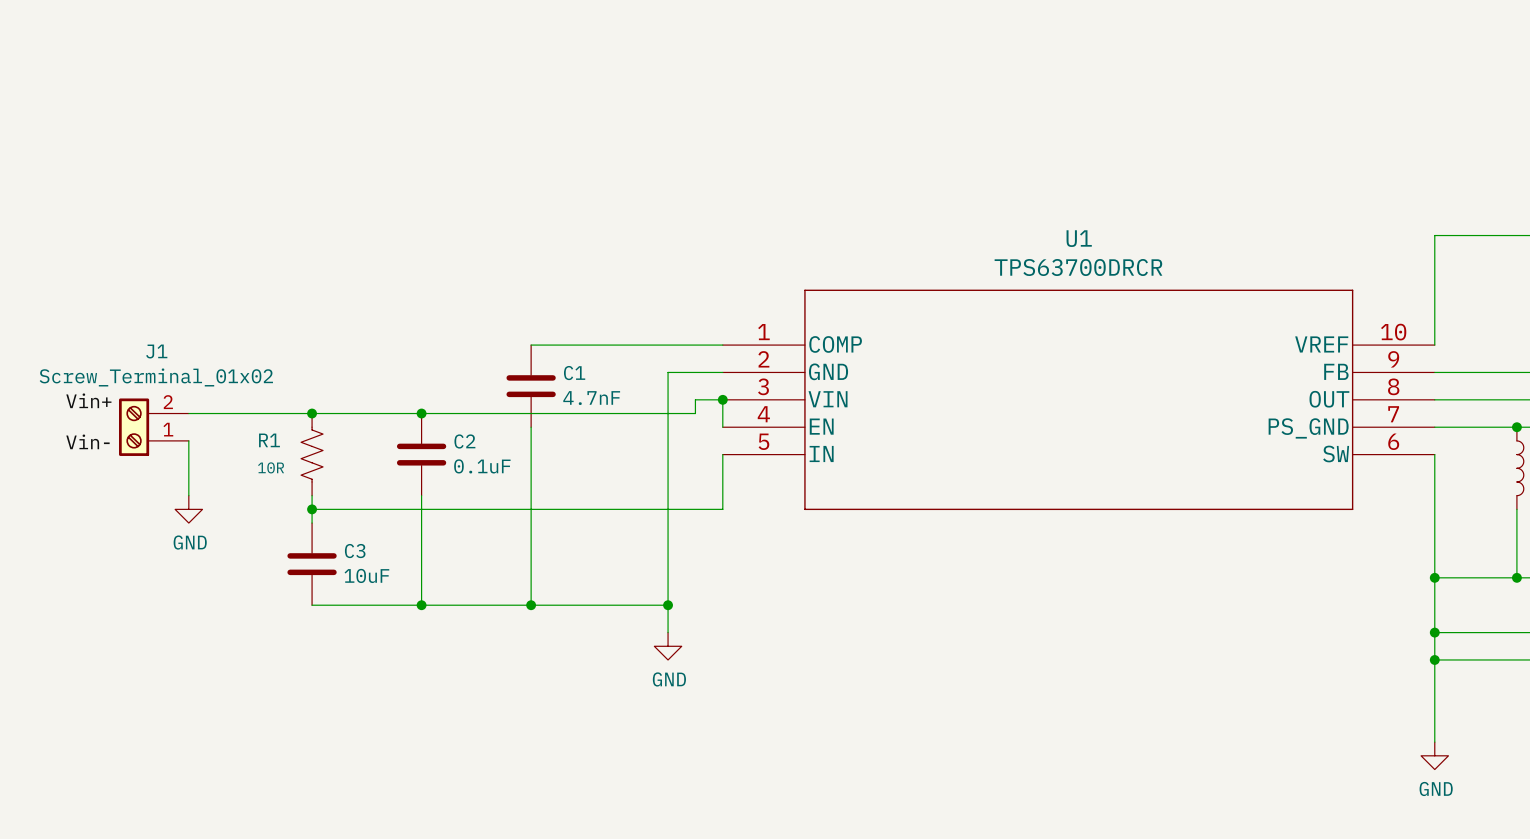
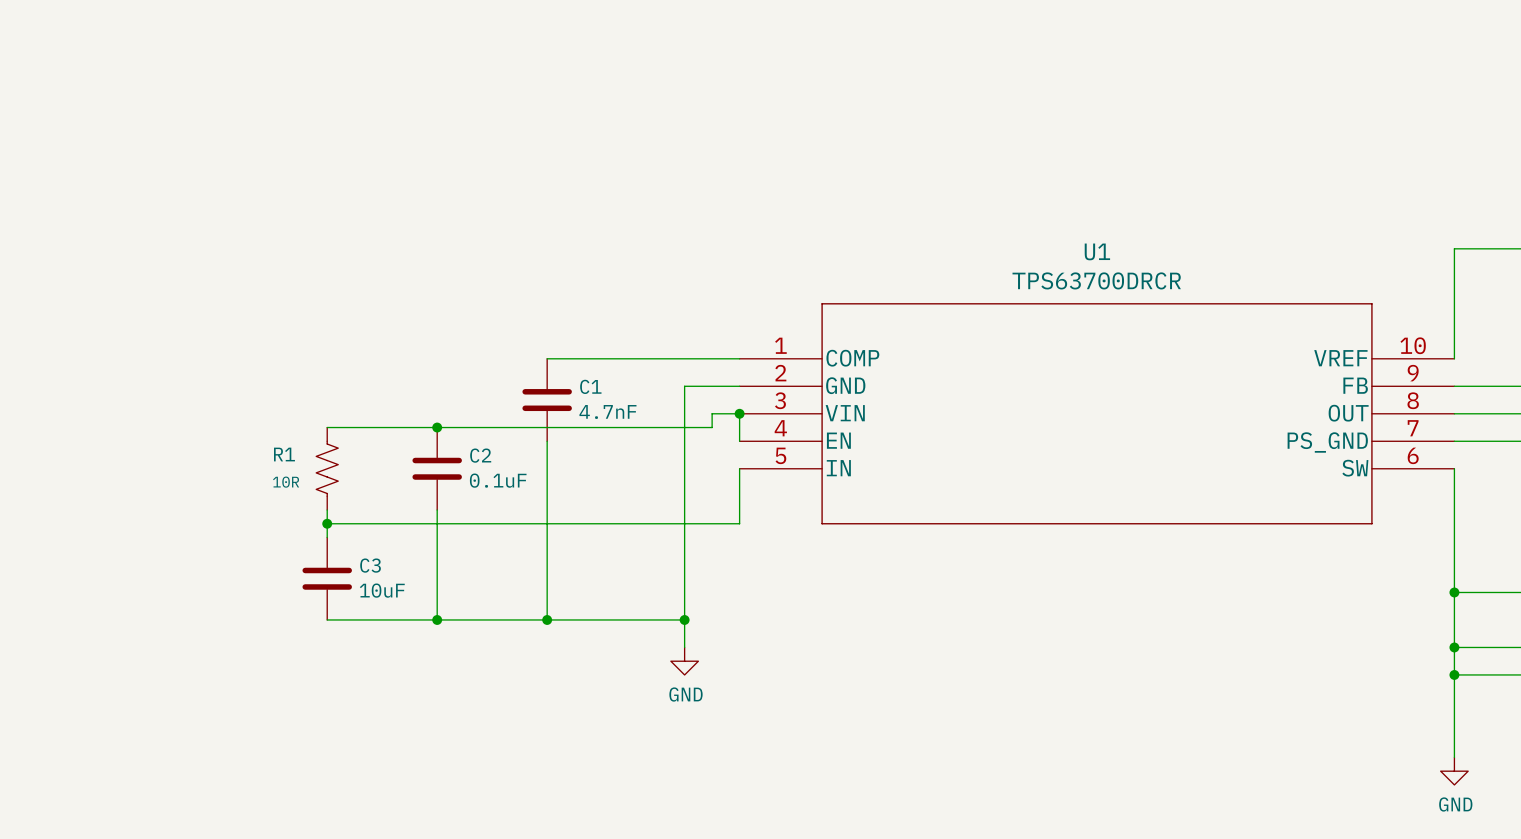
label: Vin+ (88, 400) -> none
wire: (188, 413) (312, 413) -> none
junction: (312, 413) -> none
J1: Screw_Terminal_01x02 (153, 427) -> none
wire: (188, 440) (188, 495) -> none
label: Vin- (87, 441) -> none
power symbol: GND (188, 509) -> none

